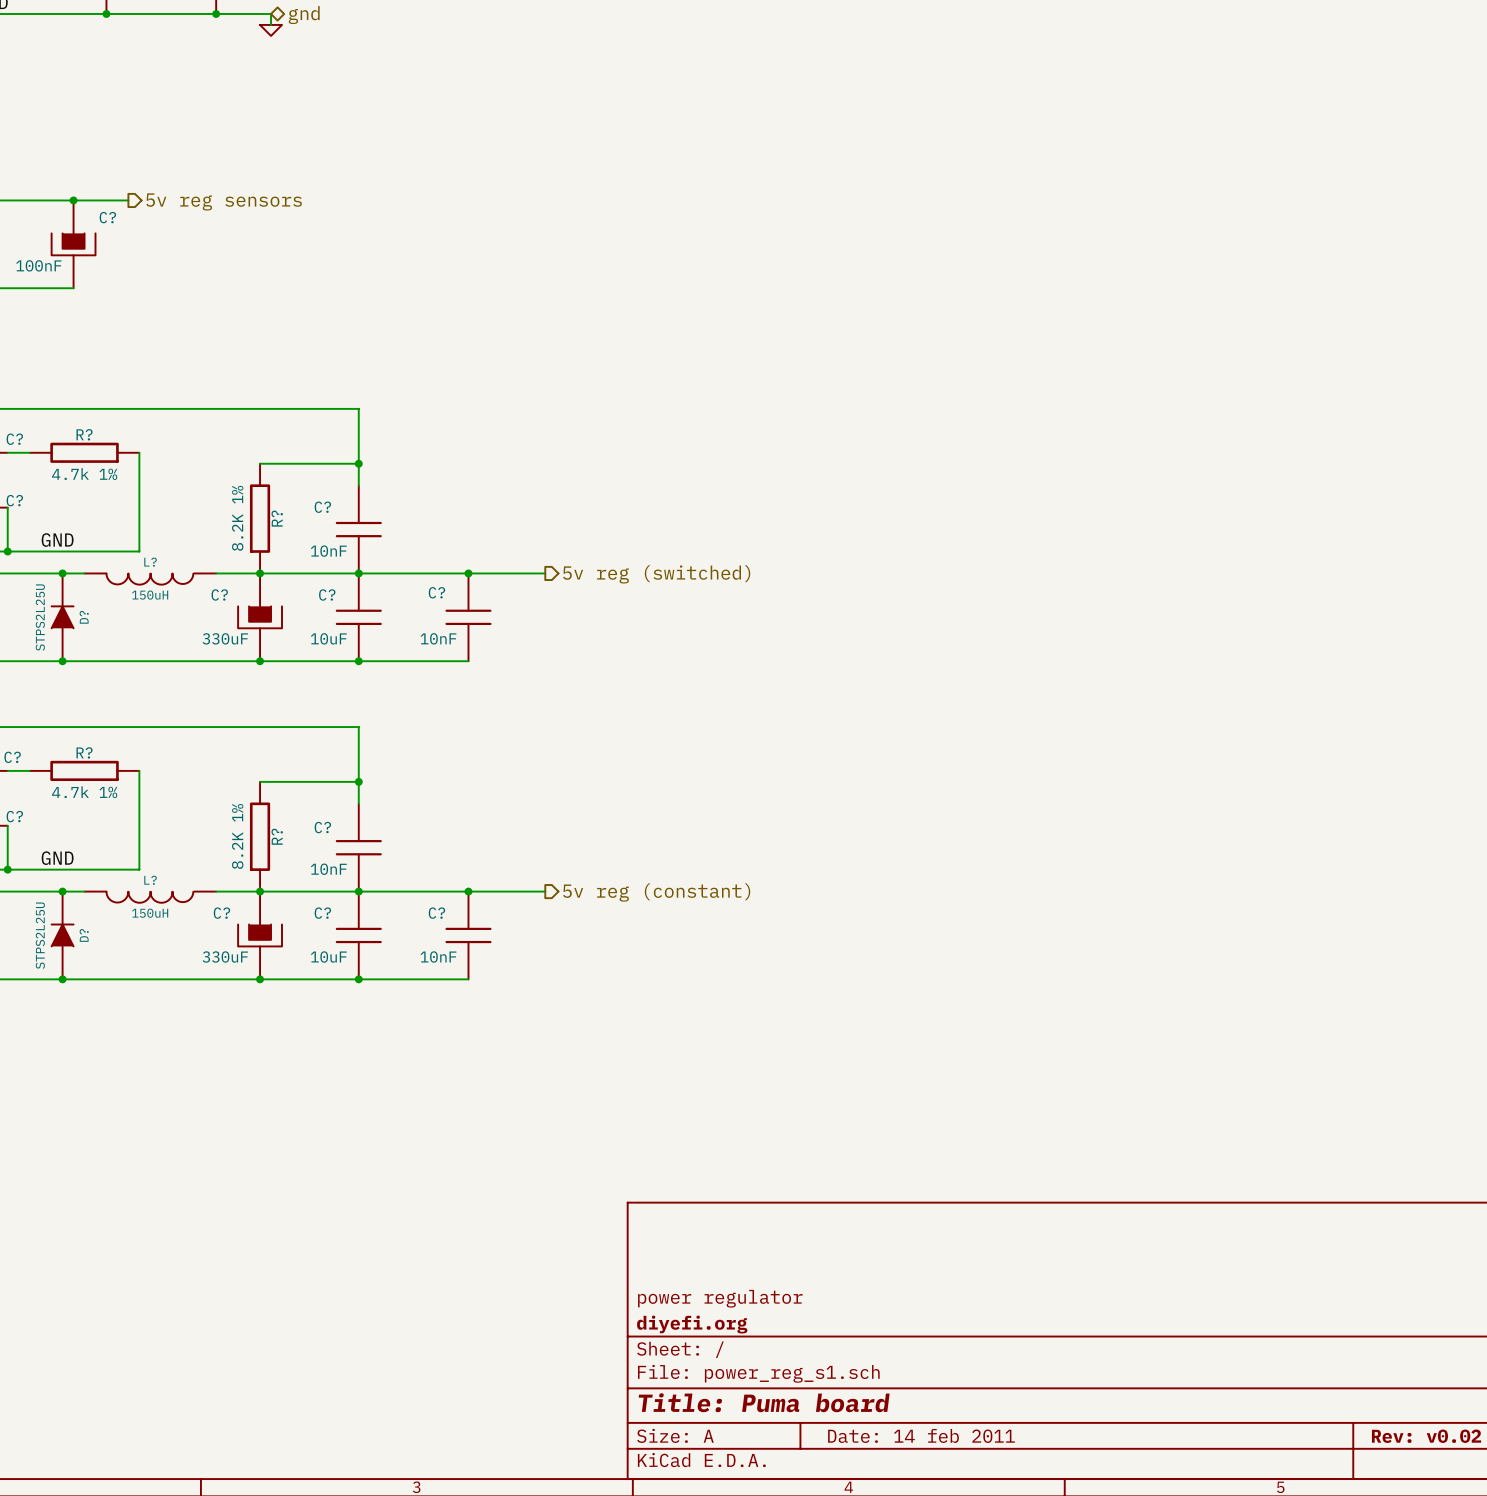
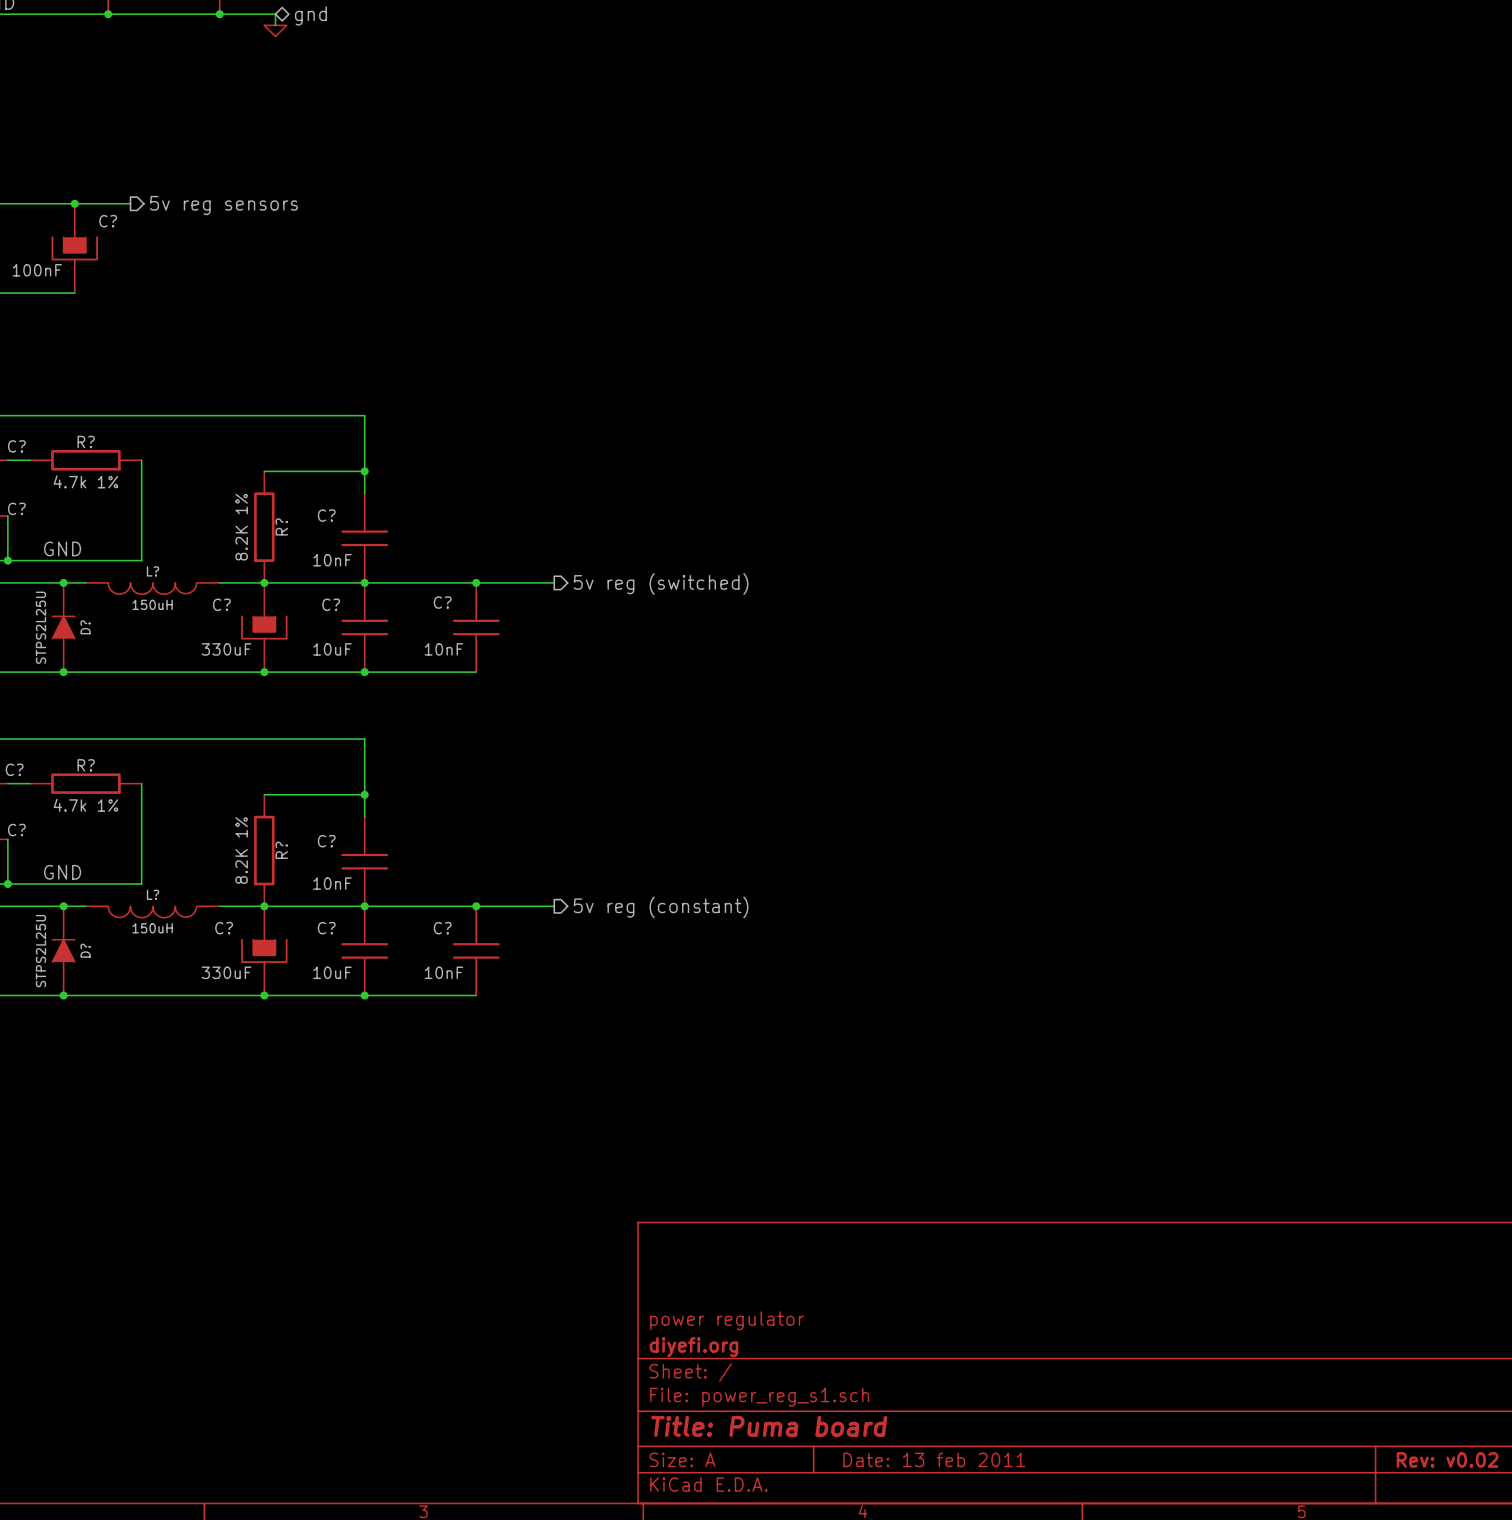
title block: Date: 14 feb 2011 (921, 1435) -> Date: 13 feb 2011 (934, 1459)

